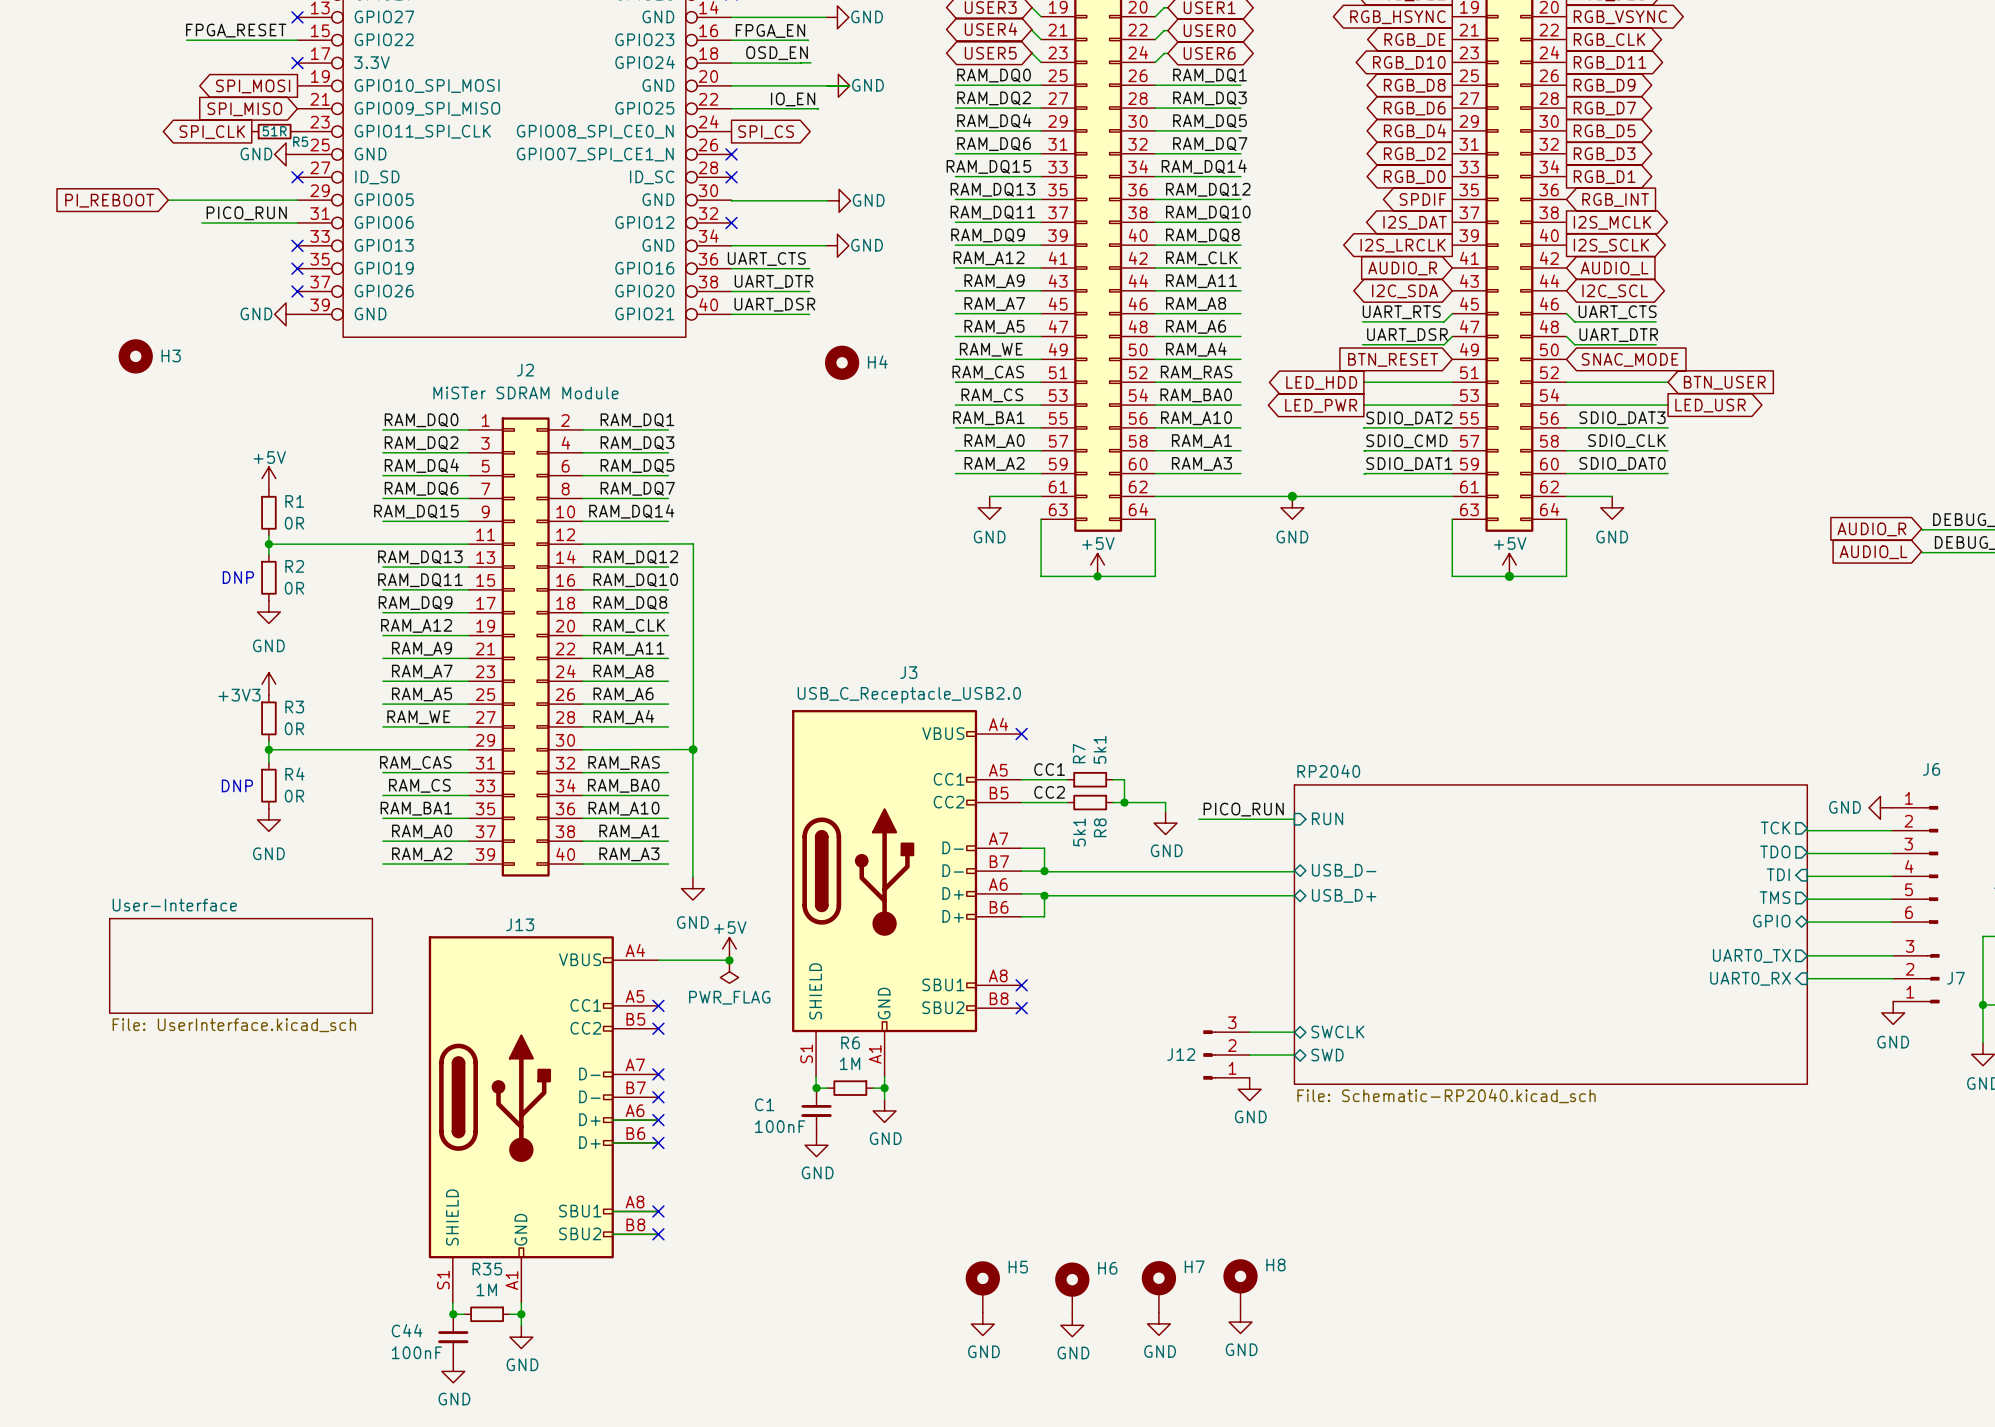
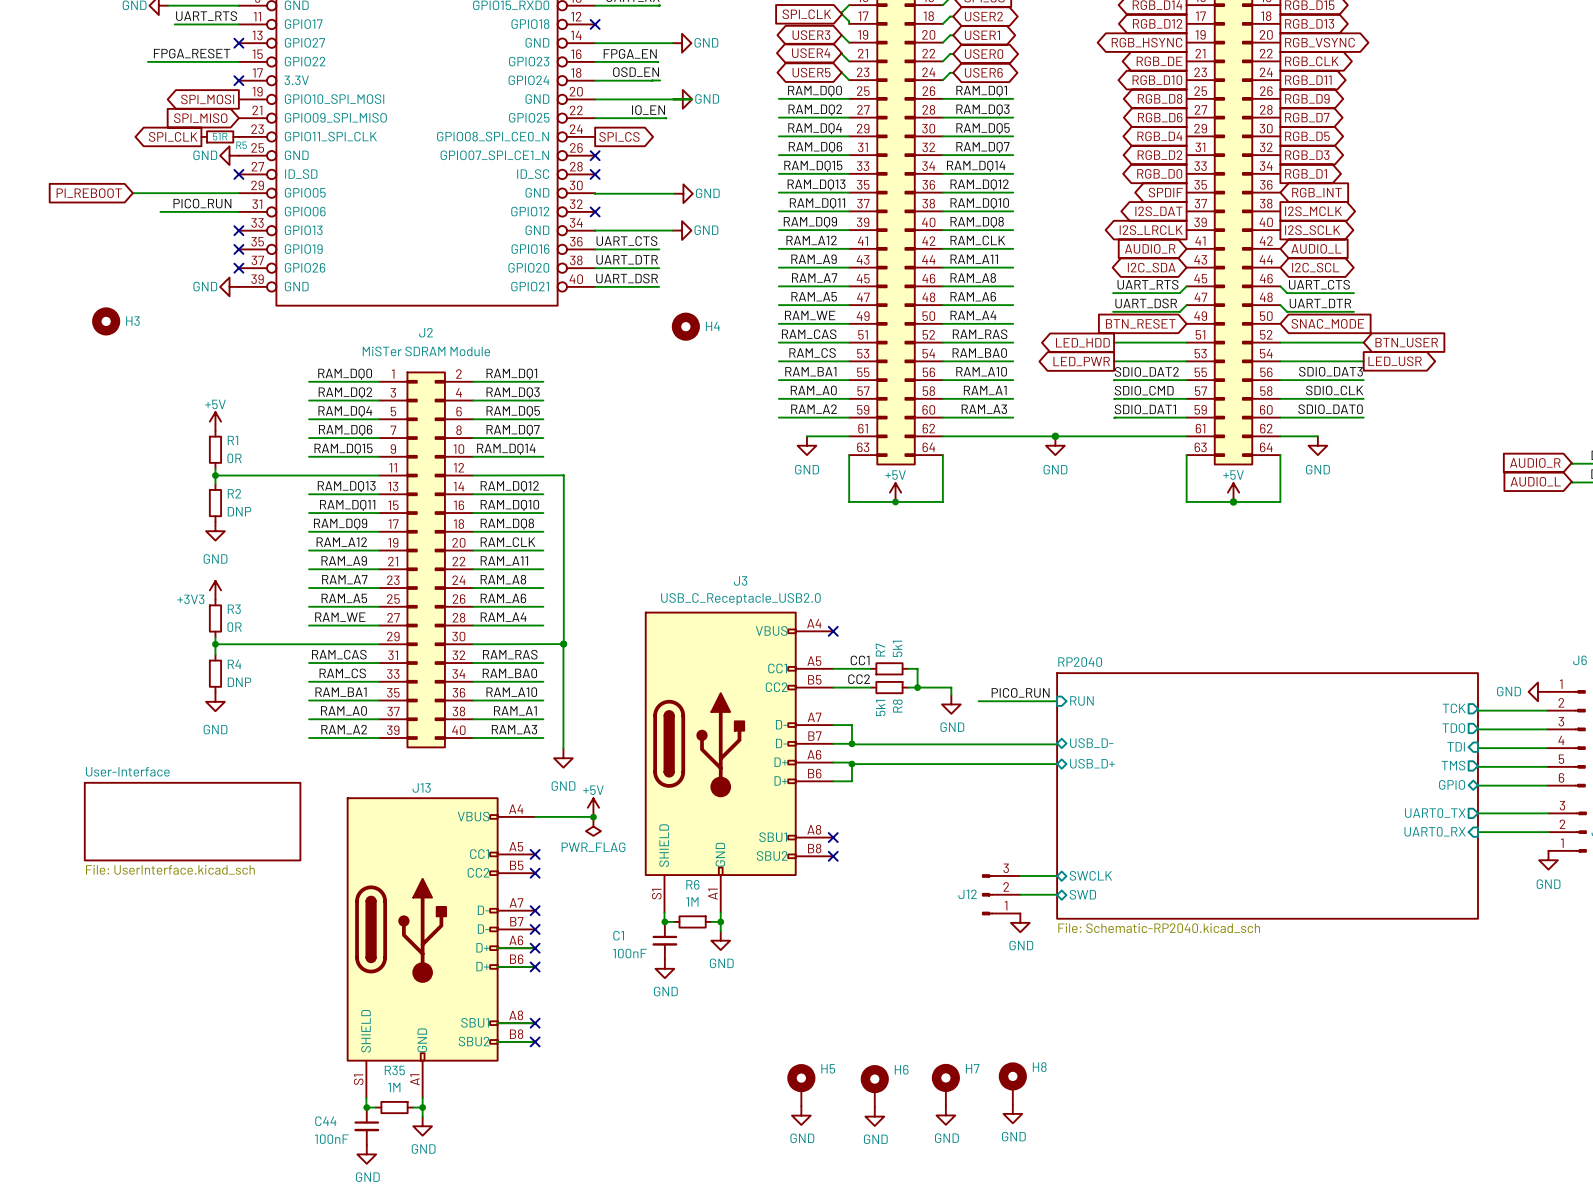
text: DNP (238, 577) -> none
R2 value: 0R (294, 588) -> DNP (239, 511)
text: DNP (237, 785) -> none
R4 value: 0R (294, 796) -> DNP (239, 682)

